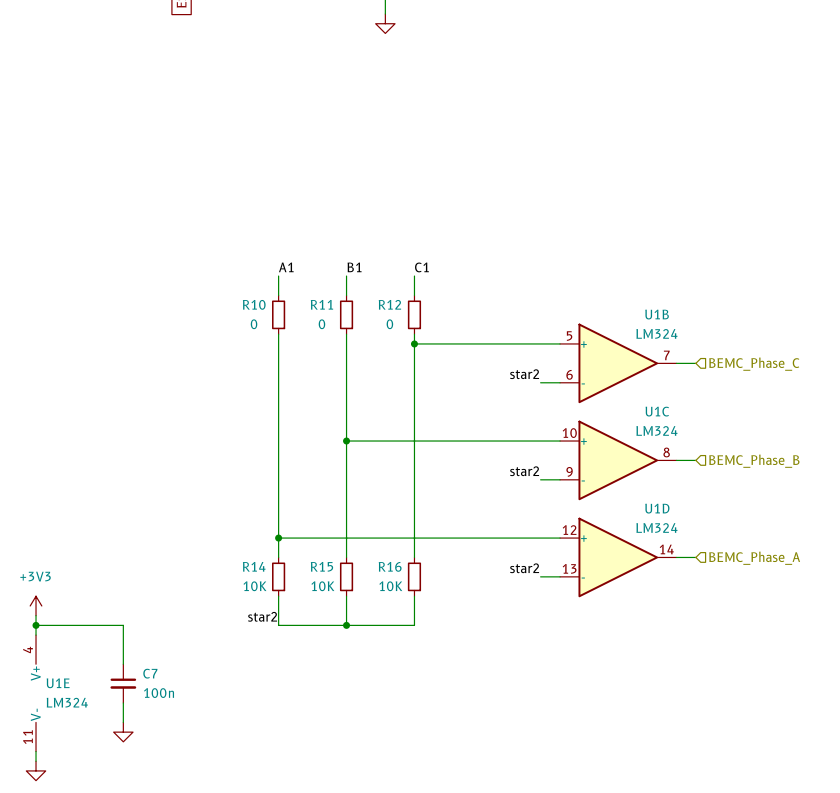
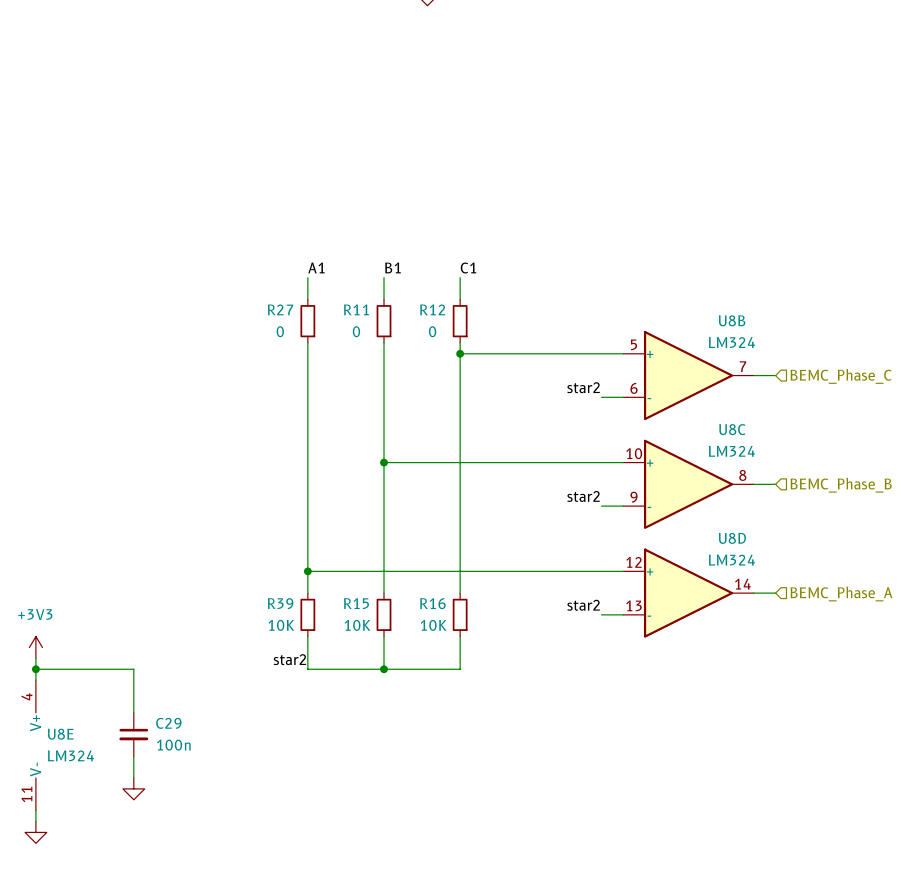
R10 name: R10 (254, 304) -> R27 (280, 309)
U1B name: U1B (657, 314) -> U8B (732, 320)
U1C name: U1C (657, 411) -> U8C (732, 429)
U1D name: U1D (657, 508) -> U8D (732, 538)
R14 name: R14 (254, 566) -> R39 (280, 603)
C7 name: C7 (150, 673) -> C29 (168, 723)
U1E name: U1E (58, 683) -> U8E (60, 734)

